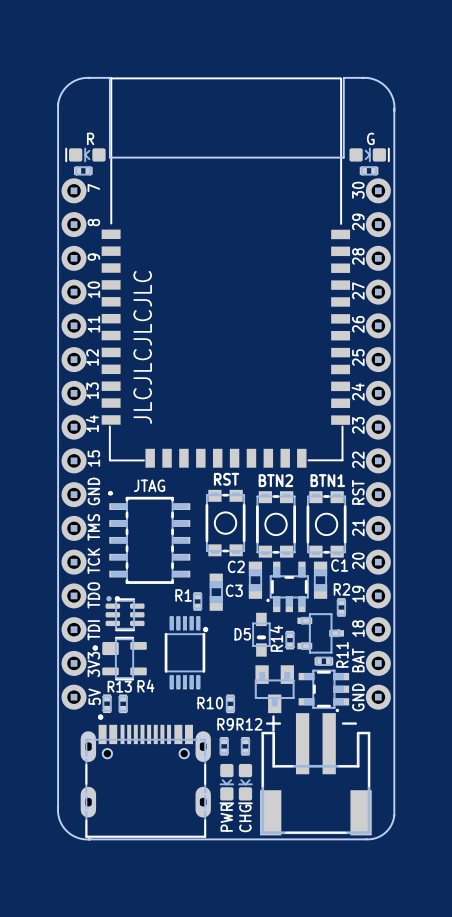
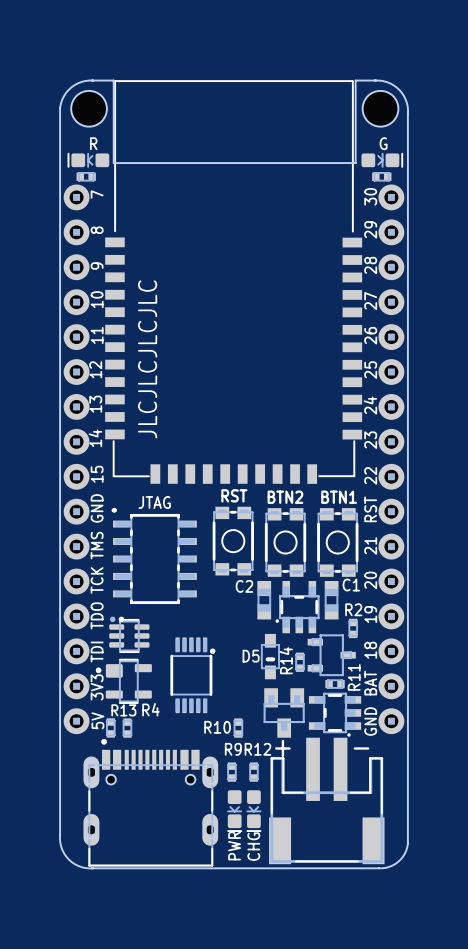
hole: none -> (89, 108)
hole: none -> (380, 108)
C3: (216, 592) -> none
R1: (197, 601) -> none

